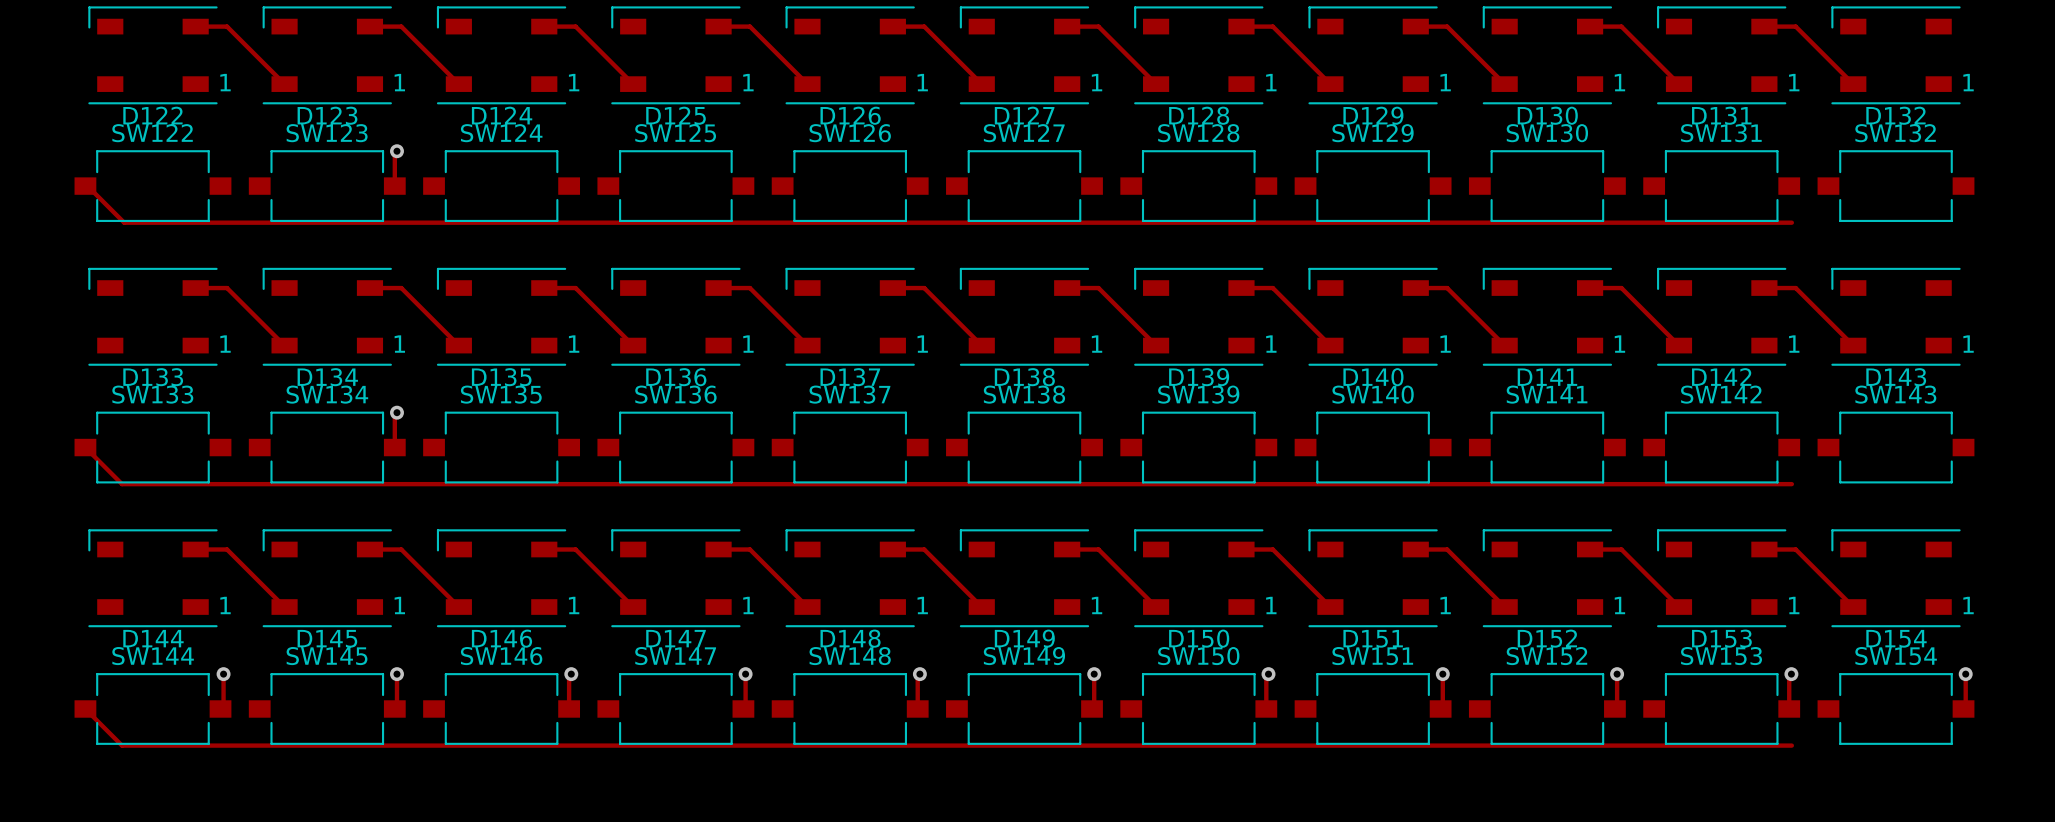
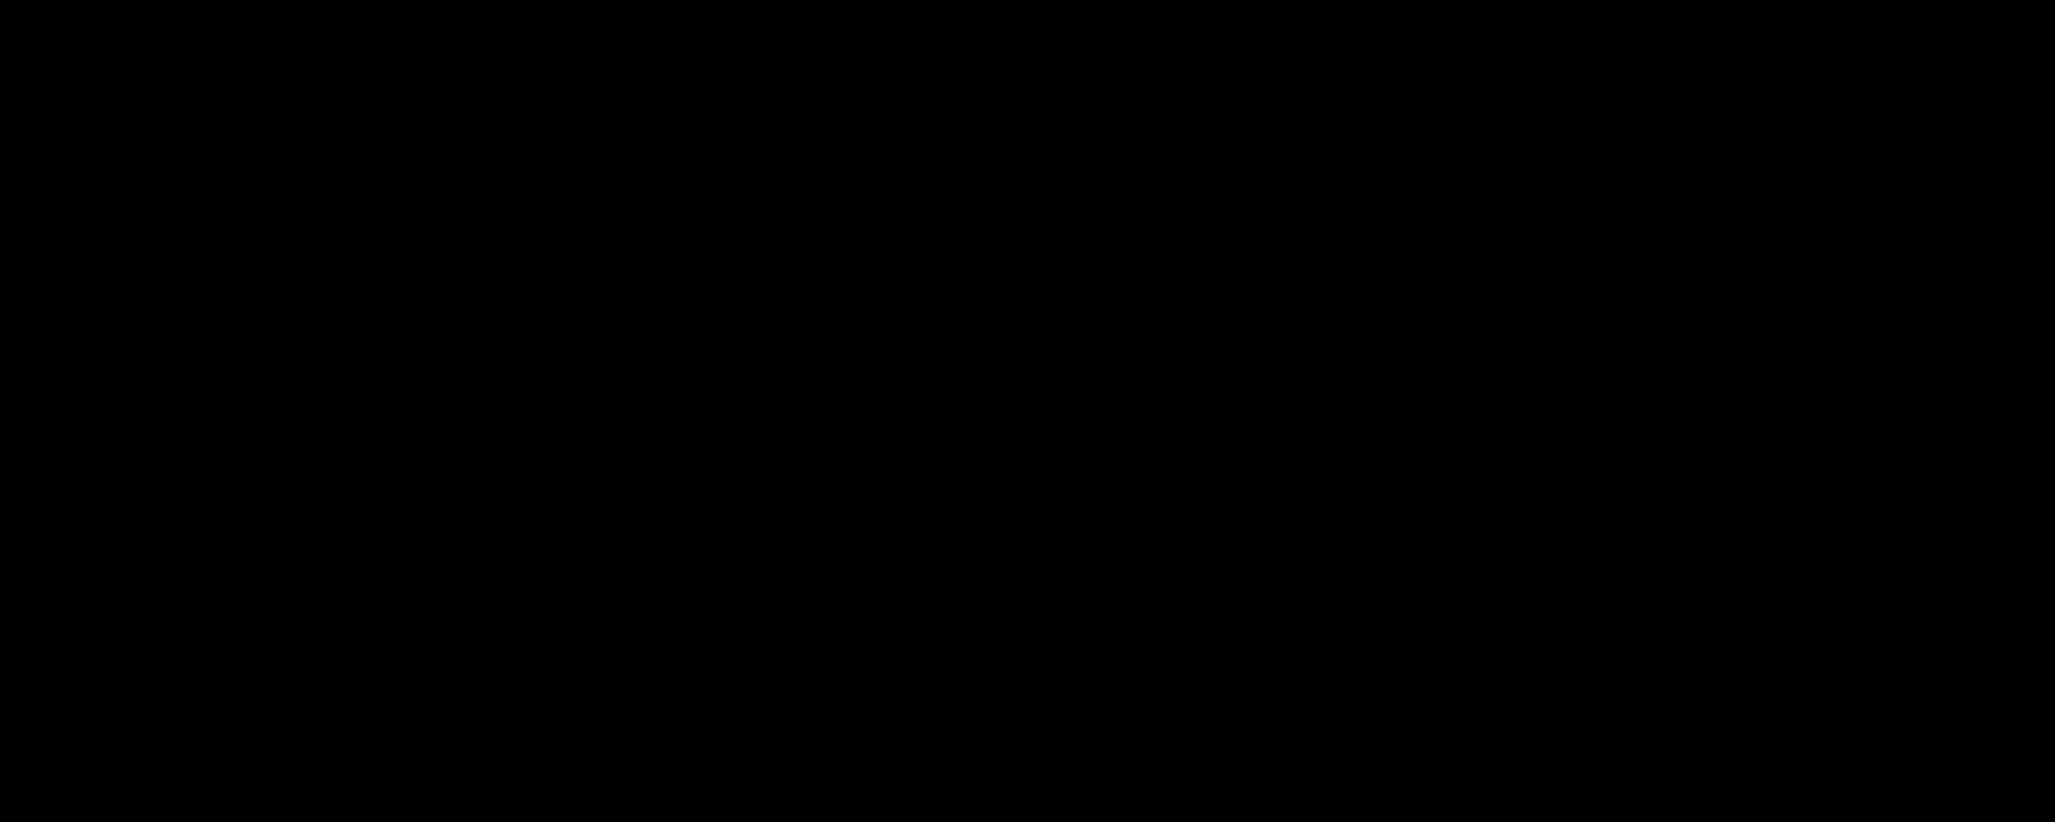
track: (195, 26) (227, 26) (284, 84) -> none
track: (369, 26) (401, 26) (458, 84) -> none
track: (544, 26) (575, 26) (633, 84) -> none
track: (718, 26) (749, 26) (807, 84) -> none
track: (892, 26) (924, 26) (981, 84) -> none
track: (1067, 26) (1098, 26) (1156, 84) -> none
track: (1241, 26) (1272, 26) (1330, 84) -> none
track: (1415, 26) (1447, 26) (1504, 84) -> none
track: (1590, 26) (1621, 26) (1678, 84) -> none
track: (1764, 26) (1795, 26) (1853, 84) -> none
D122: (152, 55) -> none
D123: (327, 55) -> none
D124: (501, 55) -> none
D125: (675, 55) -> none
D126: (850, 55) -> none
D127: (1024, 55) -> none
D128: (1198, 55) -> none
D129: (1373, 55) -> none
D130: (1547, 55) -> none
D131: (1721, 55) -> none
D132: (1895, 55) -> none
track: (396, 151) (394, 153) (394, 186) -> none
via: (396, 151) -> none
track: (85, 186) (124, 222) (1791, 222) -> none
SW122: (152, 186) -> none
SW123: (327, 186) -> none
SW124: (501, 186) -> none
SW125: (675, 186) -> none
SW126: (850, 186) -> none
SW127: (1024, 186) -> none
SW128: (1198, 186) -> none
SW129: (1373, 186) -> none
SW130: (1547, 186) -> none
SW131: (1721, 186) -> none
SW132: (1895, 186) -> none
track: (195, 288) (227, 288) (284, 345) -> none
track: (369, 288) (401, 288) (458, 345) -> none
track: (544, 288) (575, 288) (633, 345) -> none
track: (718, 288) (749, 288) (807, 345) -> none
track: (892, 288) (924, 288) (981, 345) -> none
track: (1067, 288) (1098, 288) (1156, 345) -> none
track: (1241, 288) (1272, 288) (1330, 345) -> none
track: (1415, 288) (1447, 288) (1504, 345) -> none
track: (1590, 288) (1621, 288) (1678, 345) -> none
track: (1764, 288) (1795, 288) (1853, 345) -> none
D133: (152, 316) -> none
D134: (327, 316) -> none
D135: (501, 316) -> none
D136: (675, 316) -> none
D137: (850, 316) -> none
D138: (1024, 316) -> none
D139: (1198, 316) -> none
D140: (1373, 316) -> none
D141: (1547, 316) -> none
D142: (1721, 316) -> none
D143: (1895, 316) -> none
track: (396, 412) (394, 414) (394, 447) -> none
via: (396, 412) -> none
track: (85, 447) (122, 484) (1791, 484) -> none
SW133: (152, 447) -> none
SW134: (327, 447) -> none
SW135: (501, 447) -> none
SW136: (675, 447) -> none
SW137: (850, 447) -> none
SW138: (1024, 447) -> none
SW139: (1198, 447) -> none
SW140: (1373, 447) -> none
SW141: (1547, 447) -> none
SW142: (1721, 447) -> none
SW143: (1895, 447) -> none
track: (195, 549) (227, 549) (284, 607) -> none
track: (369, 549) (401, 549) (458, 607) -> none
track: (544, 549) (575, 549) (633, 607) -> none
track: (718, 549) (749, 549) (807, 607) -> none
track: (892, 549) (924, 549) (981, 607) -> none
track: (1067, 549) (1098, 549) (1156, 607) -> none
track: (1241, 549) (1272, 549) (1330, 607) -> none
track: (1415, 549) (1447, 549) (1504, 607) -> none
track: (1590, 549) (1621, 549) (1678, 607) -> none
track: (1764, 549) (1795, 549) (1853, 607) -> none
D144: (152, 578) -> none
D145: (327, 578) -> none
D146: (501, 578) -> none
D147: (675, 578) -> none
D148: (850, 578) -> none
D149: (1024, 578) -> none
D150: (1198, 578) -> none
D151: (1373, 578) -> none
D152: (1547, 578) -> none
D153: (1721, 578) -> none
D154: (1895, 578) -> none
track: (223, 674) (223, 705) (220, 708) -> none
via: (223, 674) -> none
track: (396, 674) (396, 706) (394, 708) -> none
via: (396, 674) -> none
track: (571, 674) (569, 676) (569, 708) -> none
via: (571, 674) -> none
track: (745, 674) (745, 706) (743, 708) -> none
via: (745, 674) -> none
track: (919, 674) (917, 676) (917, 708) -> none
via: (919, 674) -> none
track: (1094, 674) (1094, 706) (1092, 708) -> none
via: (1094, 674) -> none
track: (1268, 674) (1266, 676) (1266, 708) -> none
via: (1268, 674) -> none
track: (1442, 674) (1442, 706) (1440, 708) -> none
via: (1442, 674) -> none
track: (1617, 674) (1617, 706) (1614, 708) -> none
via: (1617, 674) -> none
track: (1791, 674) (1789, 676) (1789, 708) -> none
via: (1791, 674) -> none
track: (1965, 674) (1965, 706) (1963, 708) -> none
via: (1965, 674) -> none
track: (85, 708) (122, 745) (1791, 745) -> none
SW144: (152, 708) -> none
SW145: (327, 708) -> none
SW146: (501, 708) -> none
SW147: (675, 708) -> none
SW148: (850, 708) -> none
SW149: (1024, 708) -> none
SW150: (1198, 708) -> none
SW151: (1373, 708) -> none
SW152: (1547, 708) -> none
SW153: (1721, 708) -> none
SW154: (1895, 708) -> none

